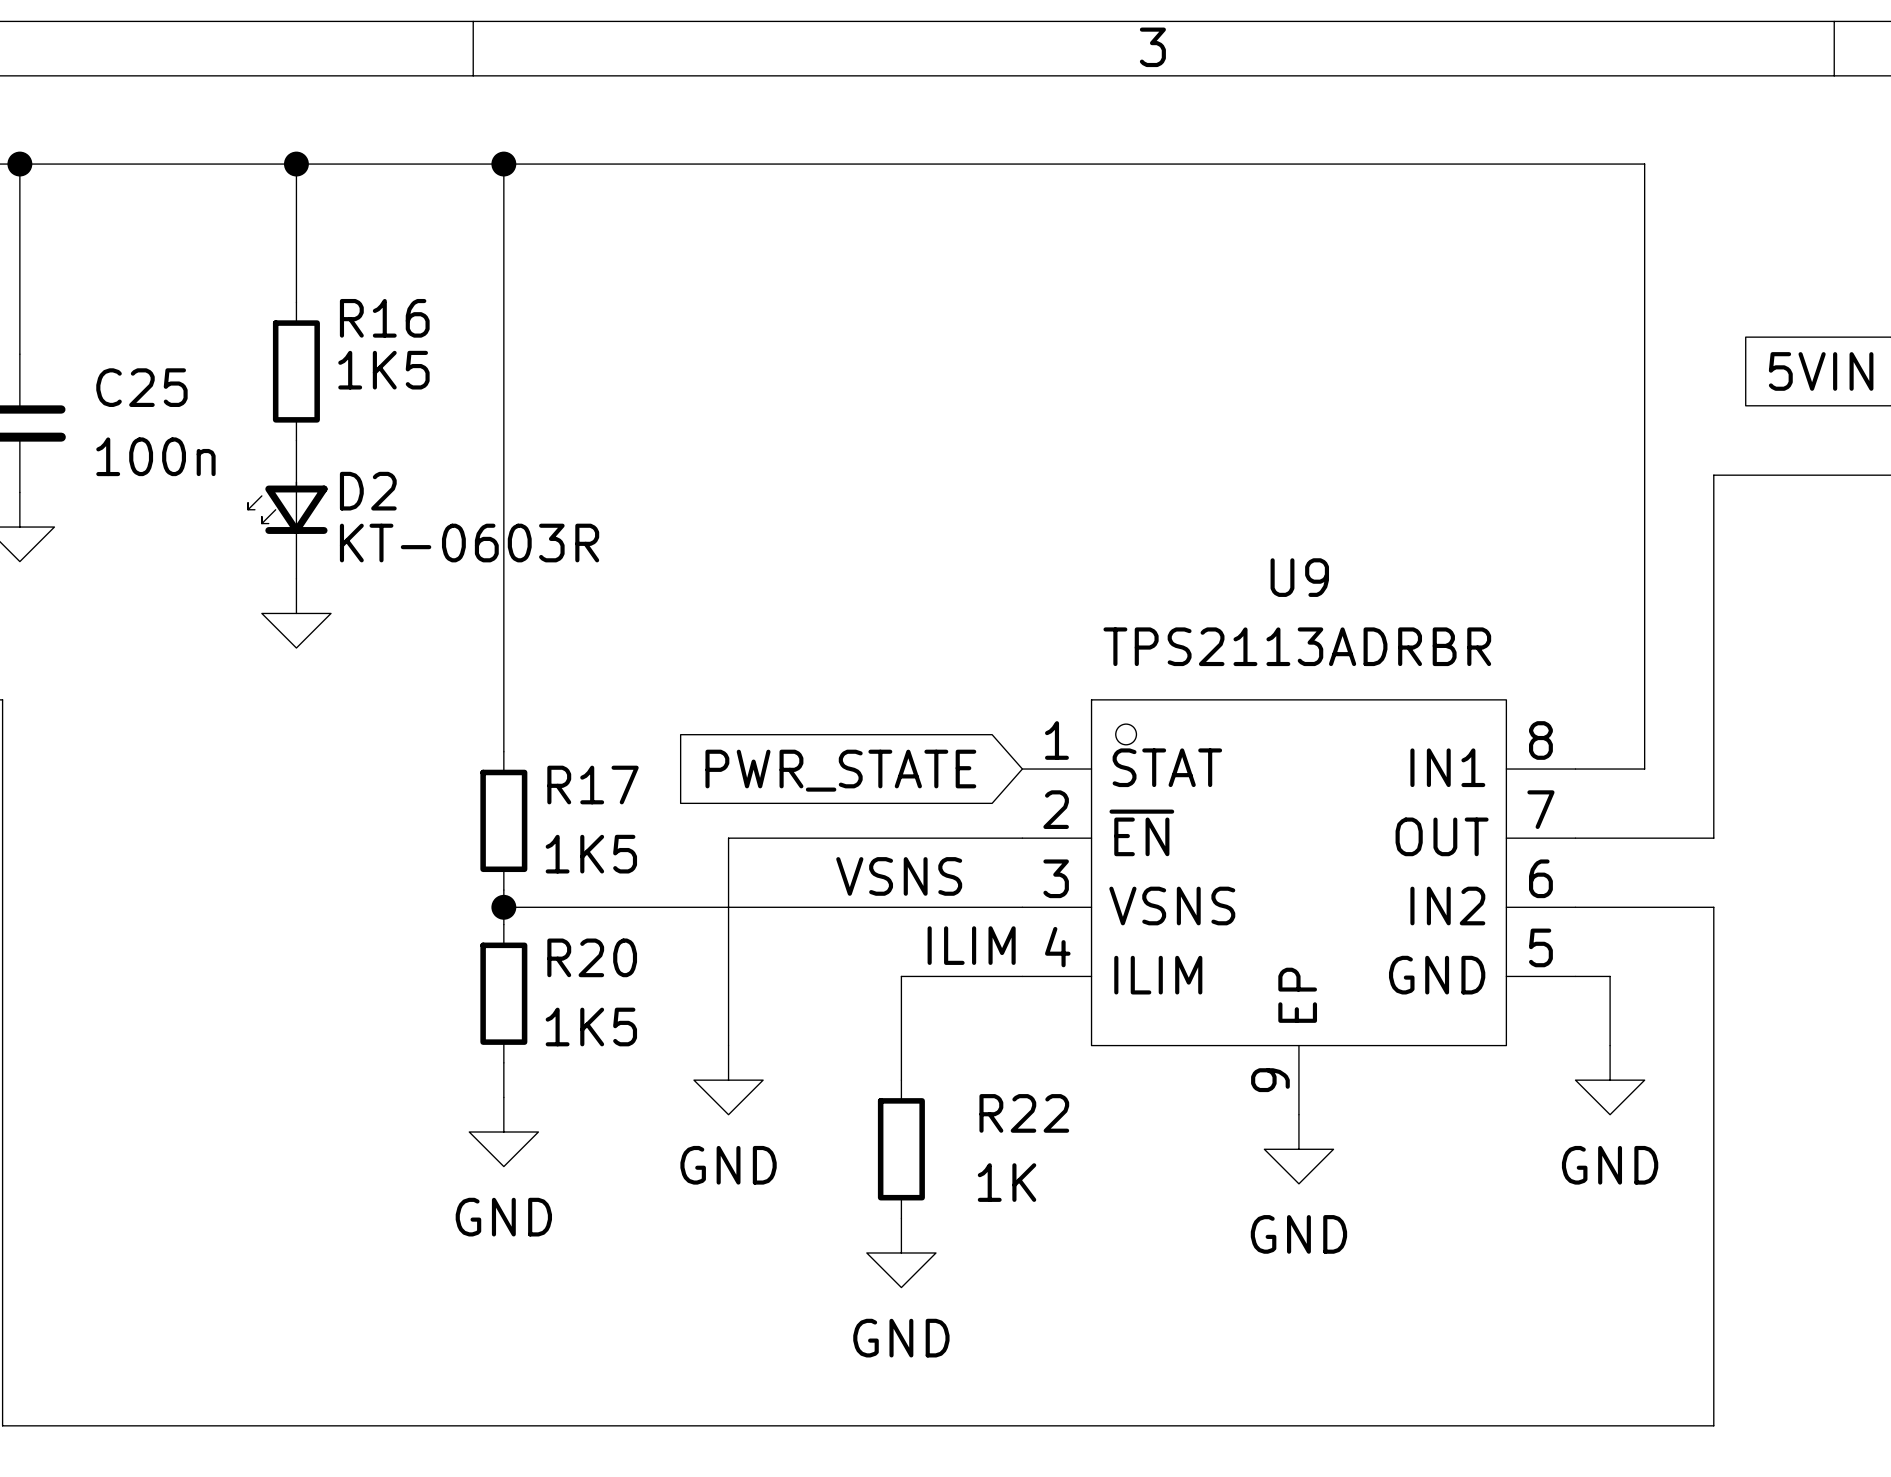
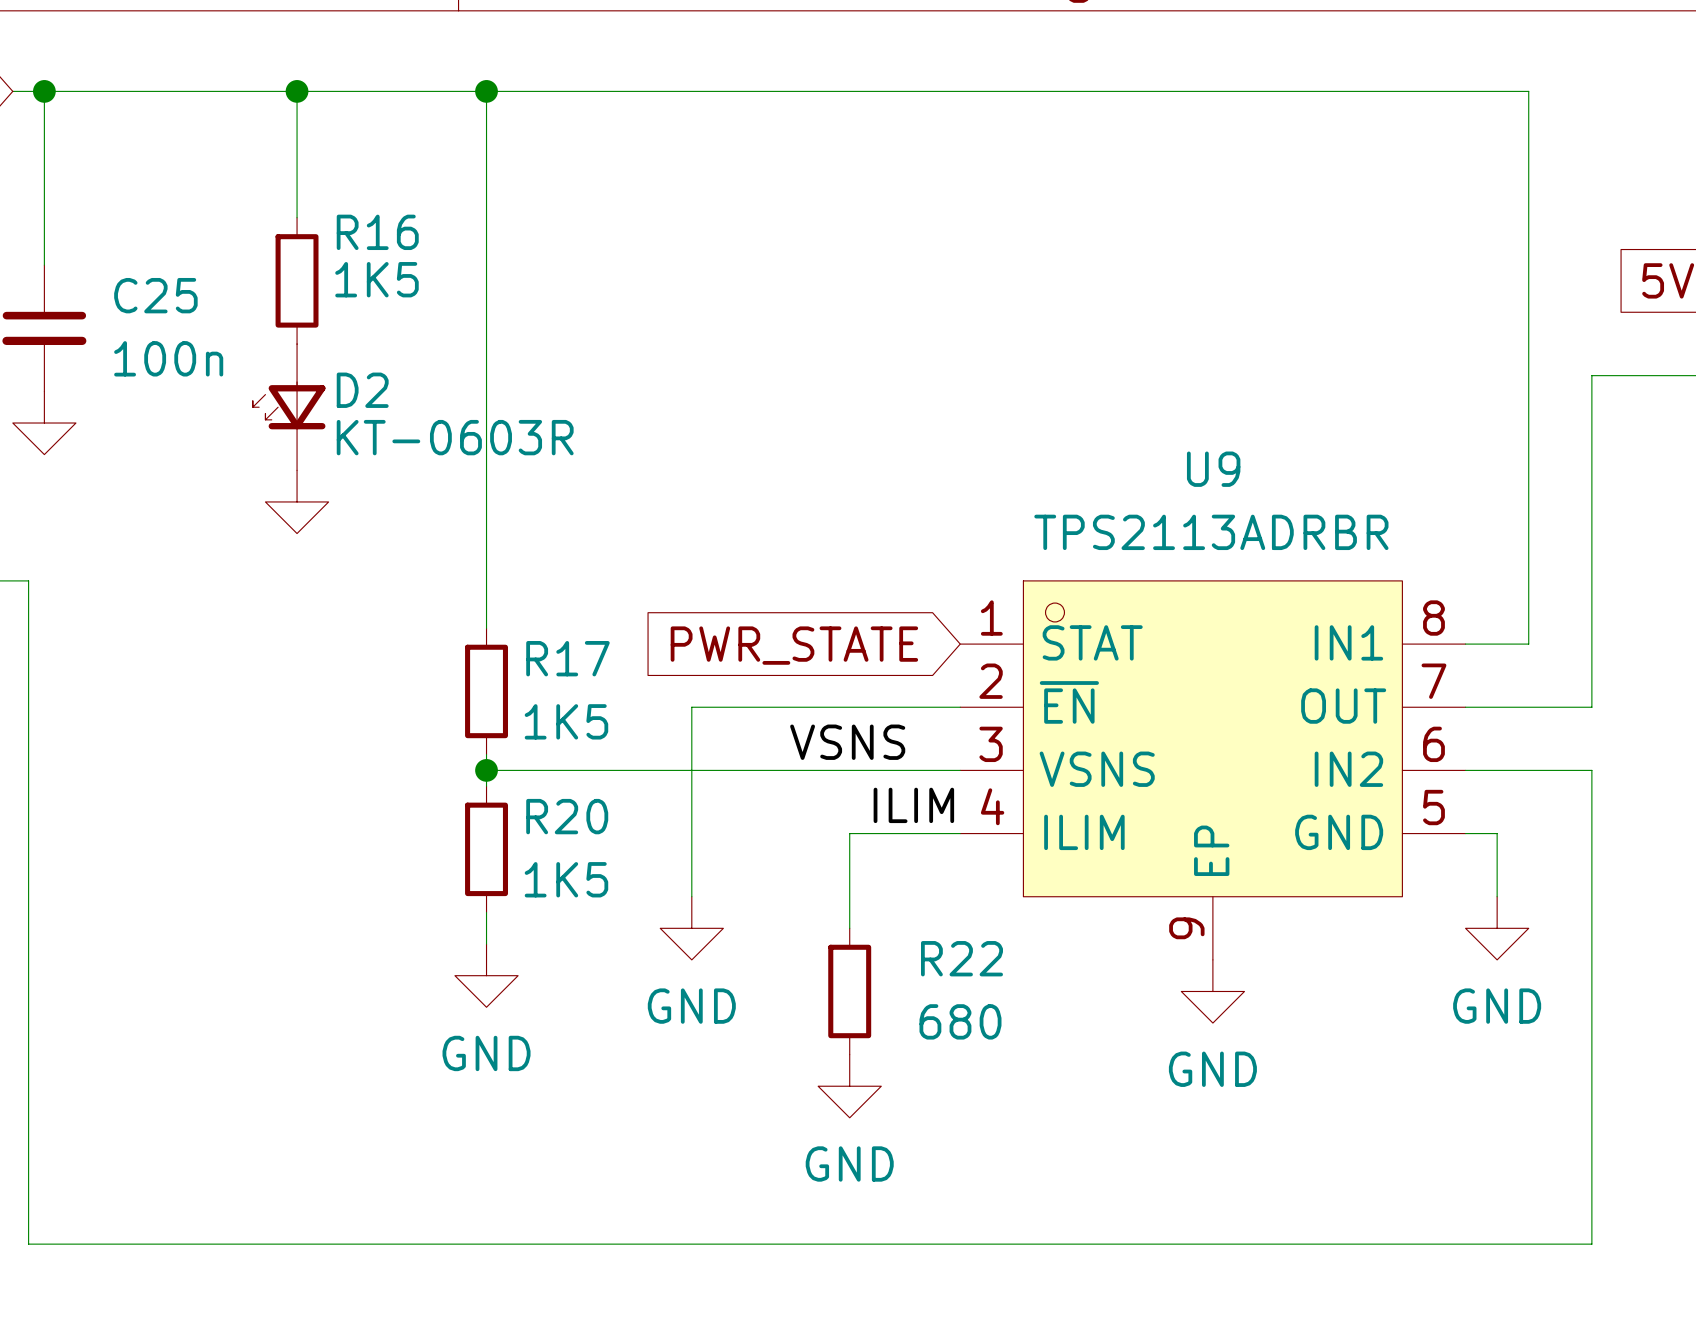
R22 value: 1K (1007, 1182) -> 680 (960, 1021)

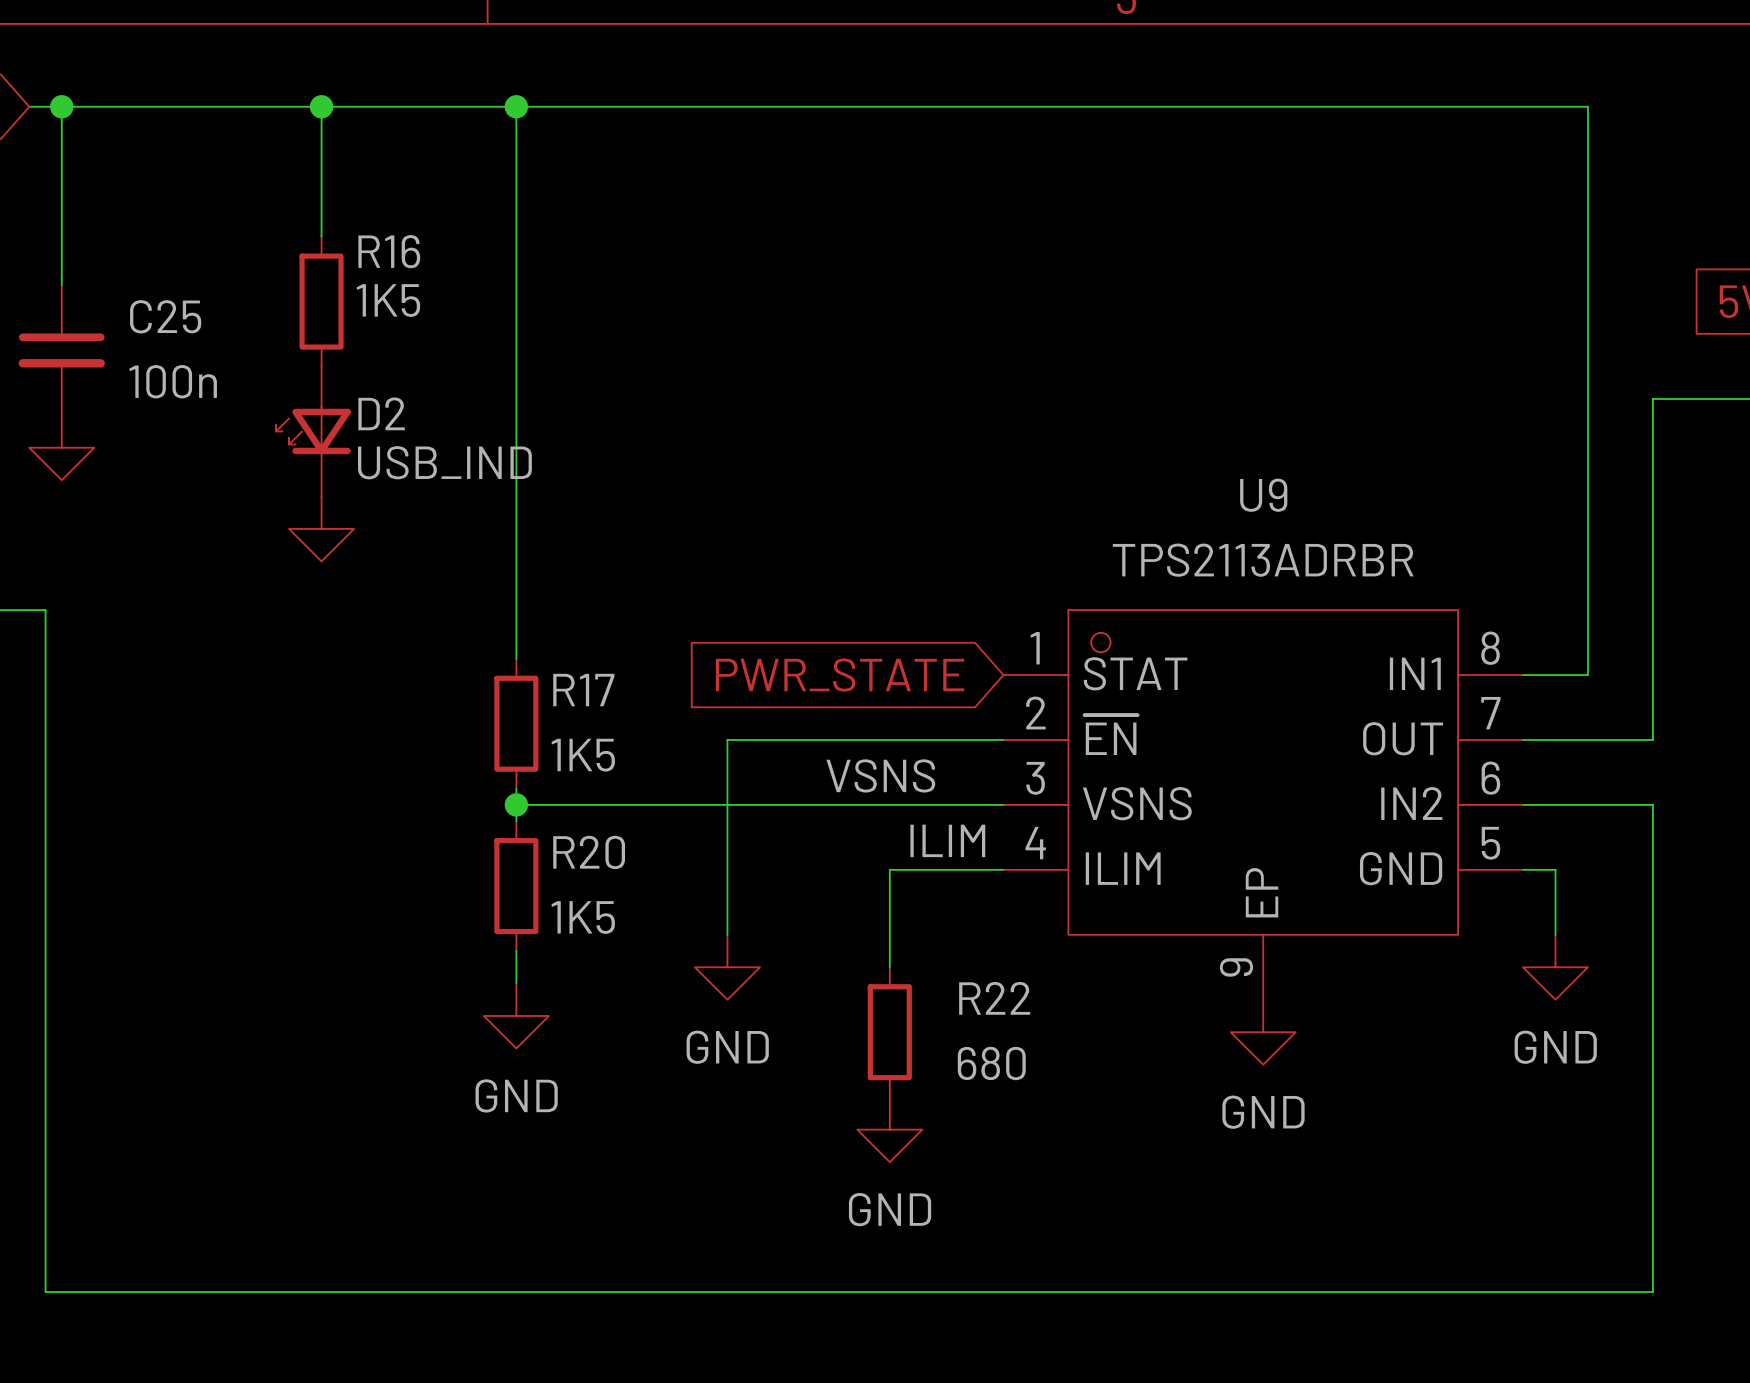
D2 value: KT-0603R (455, 437) -> USB_IND (444, 462)

